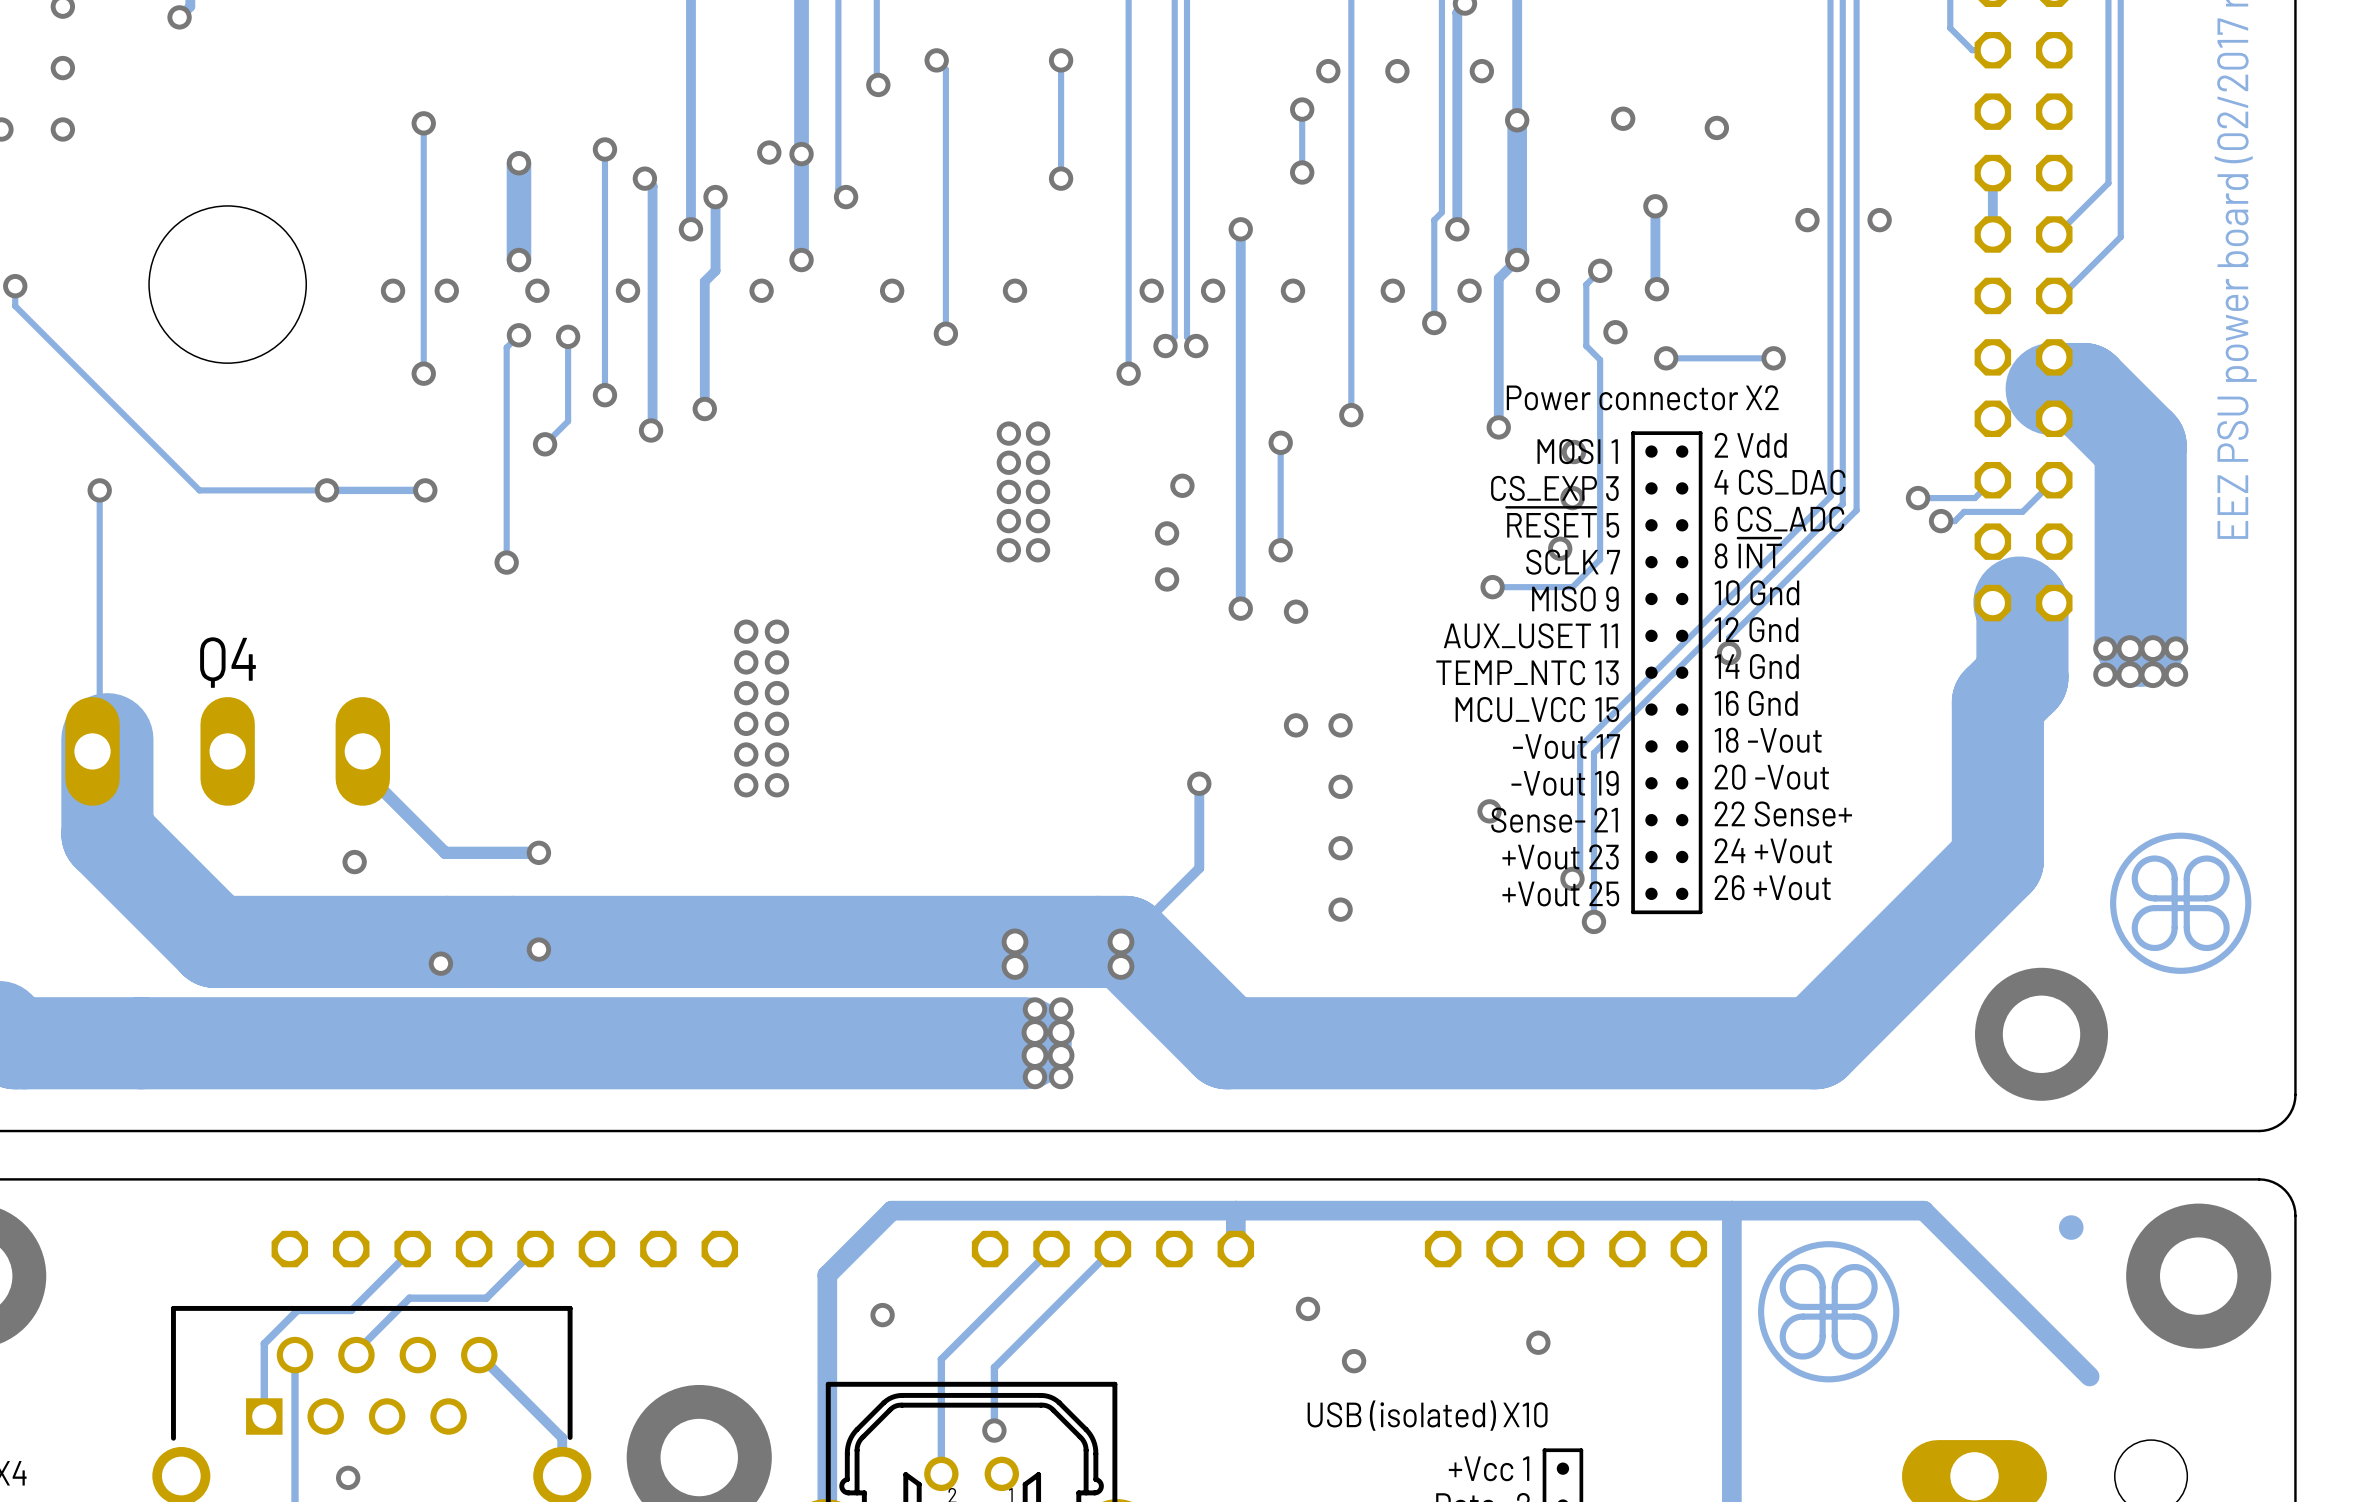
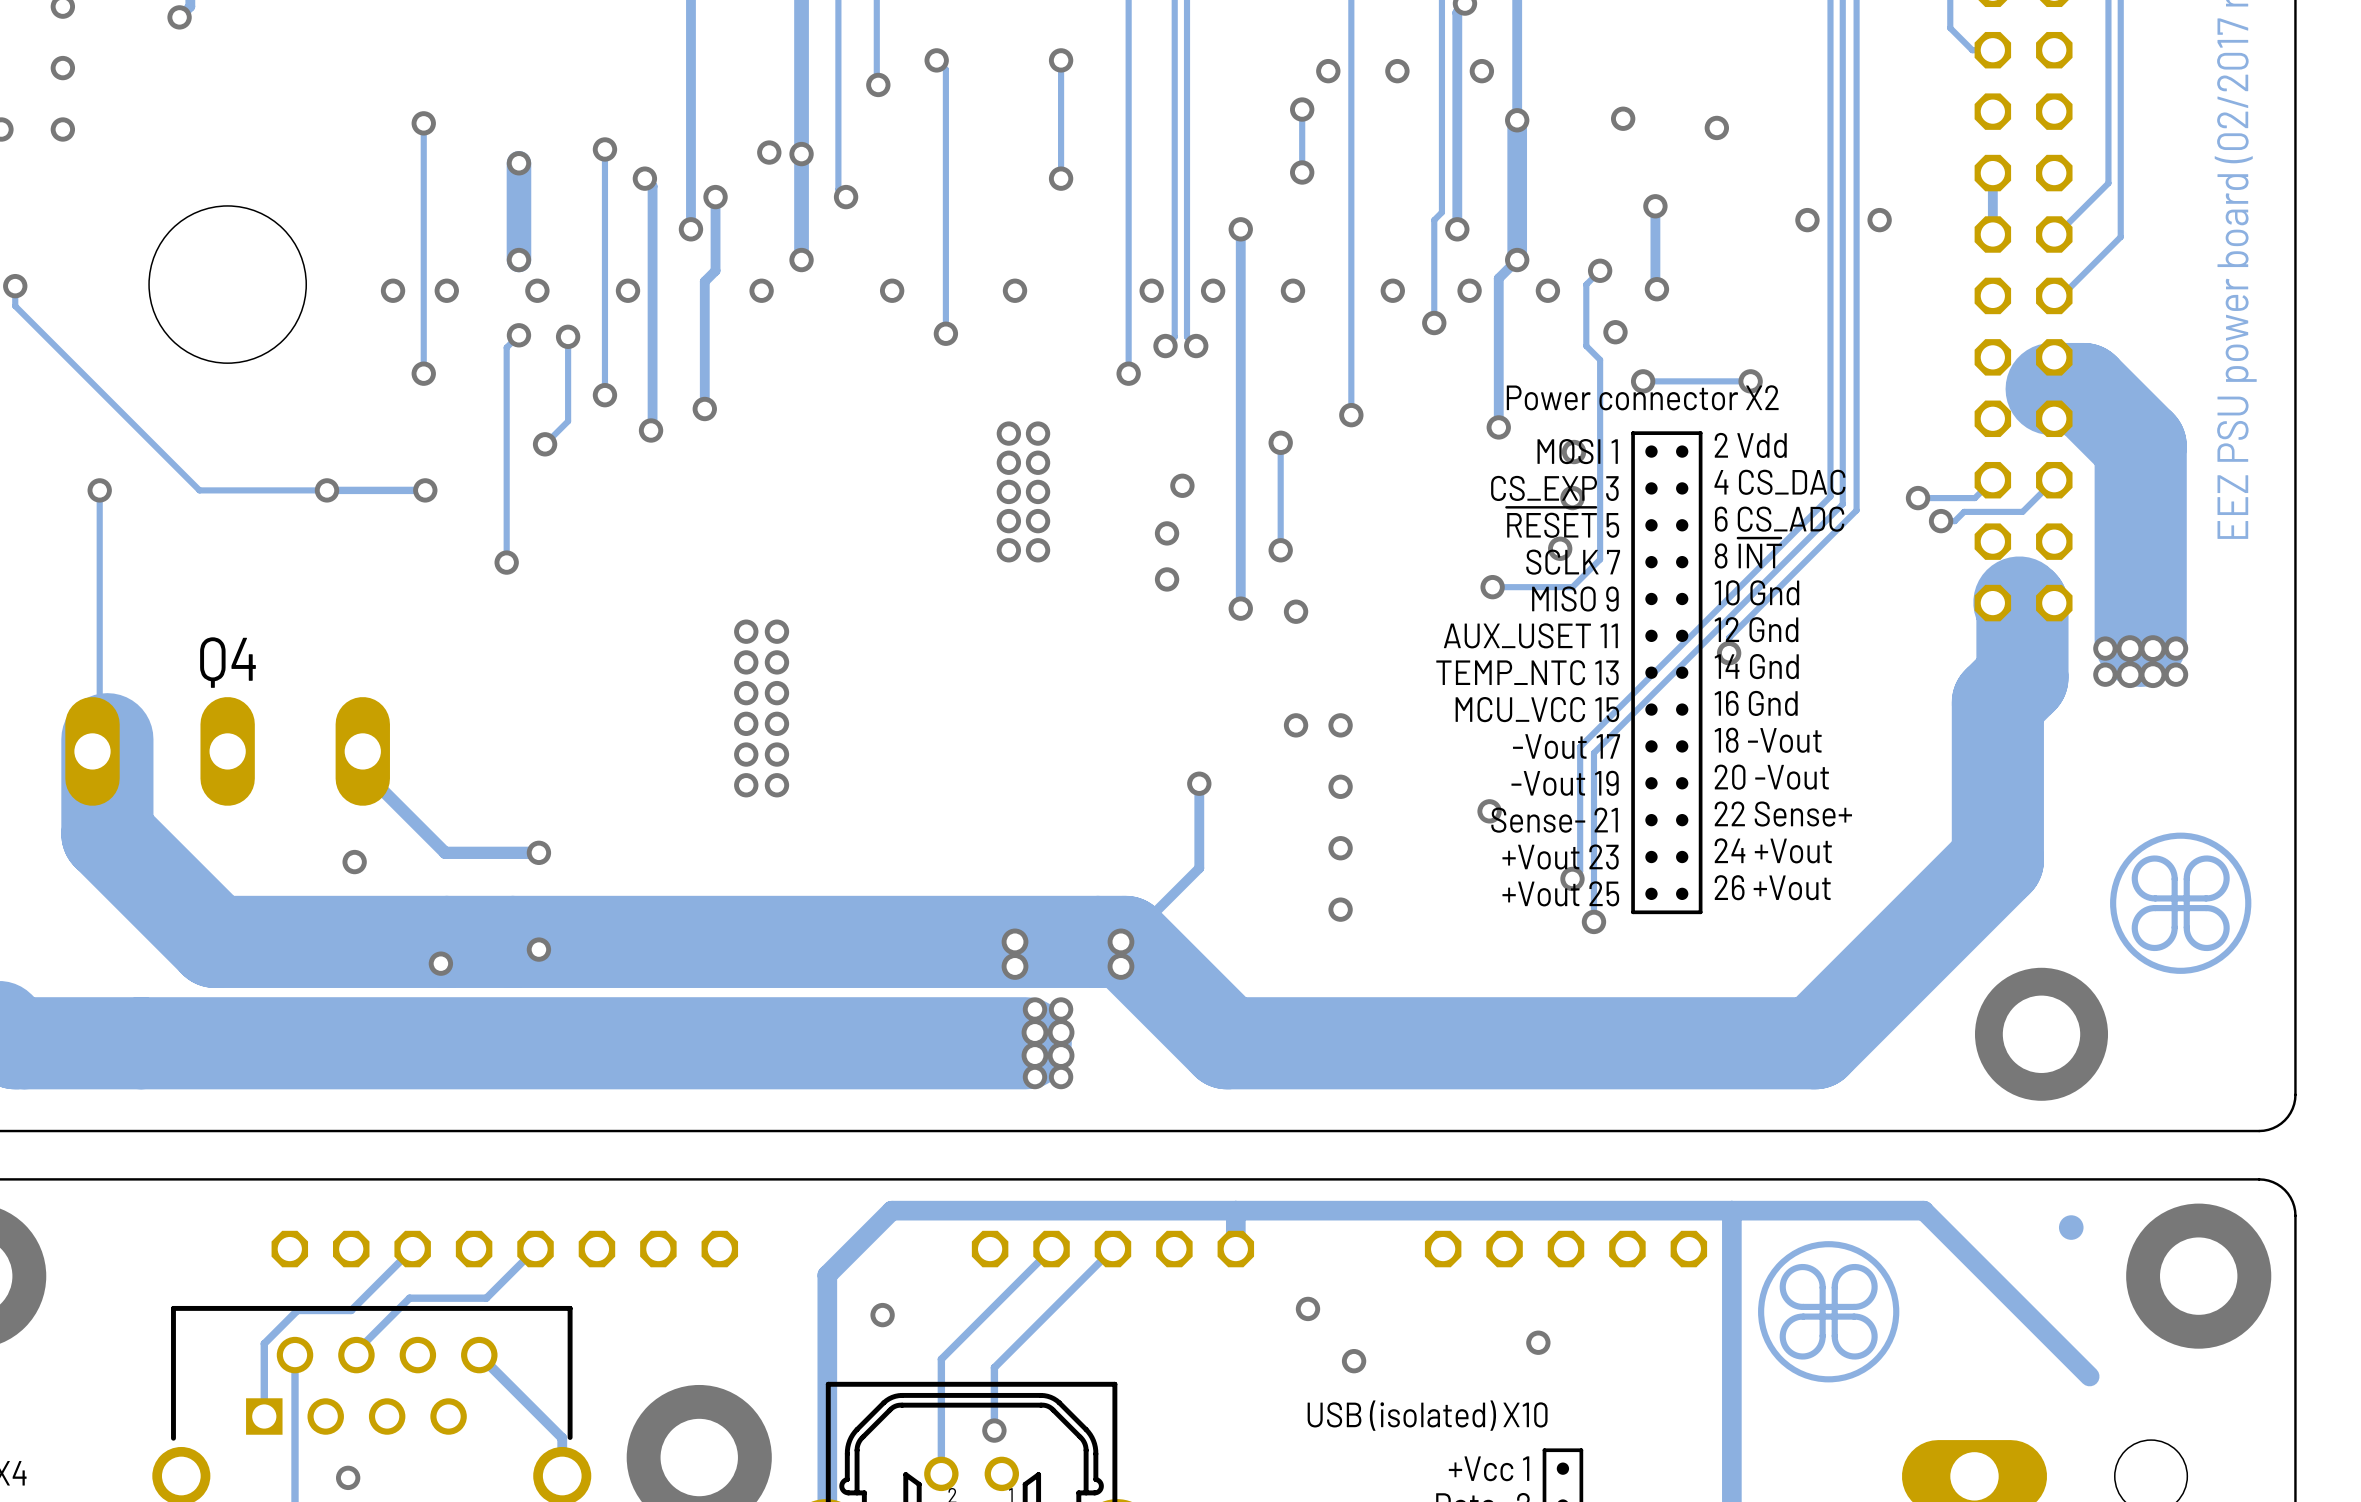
via position: (1666, 358) -> (1643, 381)
track: (1773, 358) (1666, 358) -> (1750, 381) (1643, 381)
via position: (1773, 358) -> (1750, 381)

